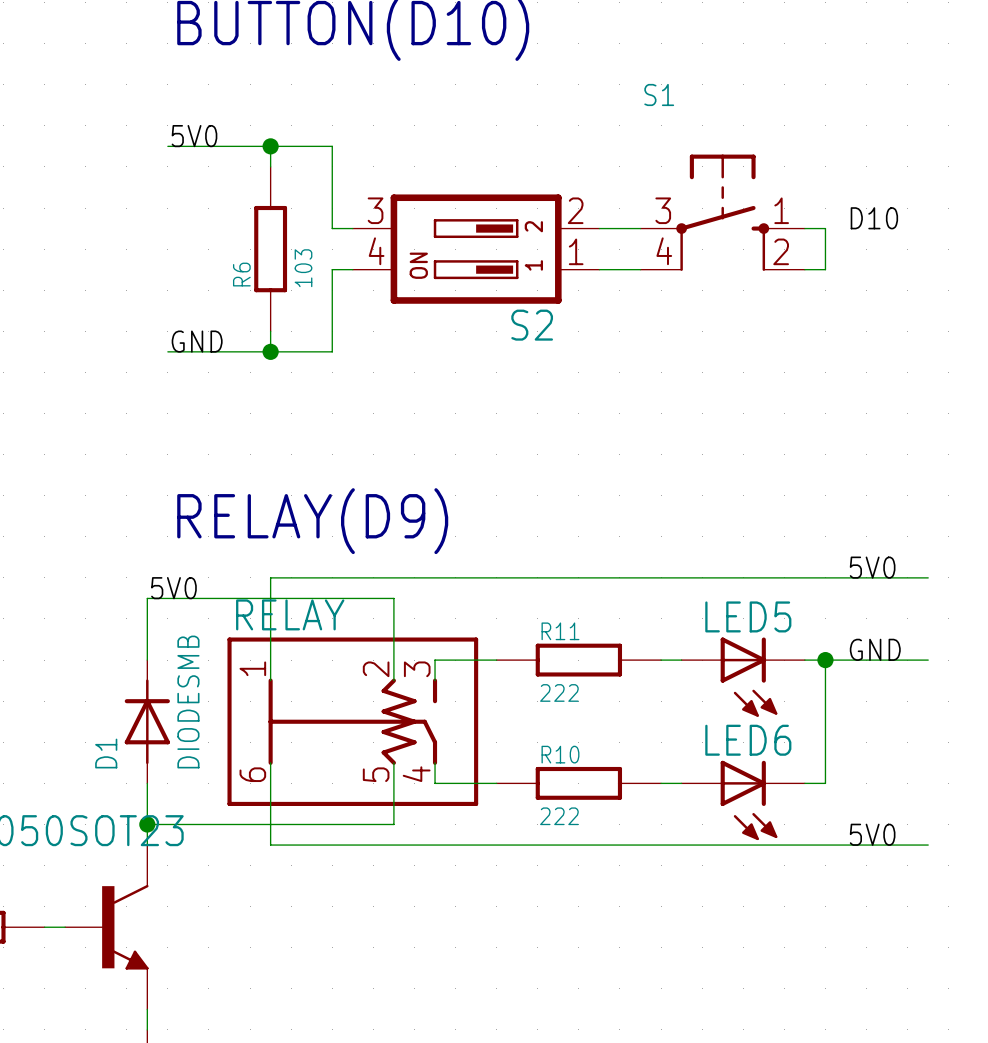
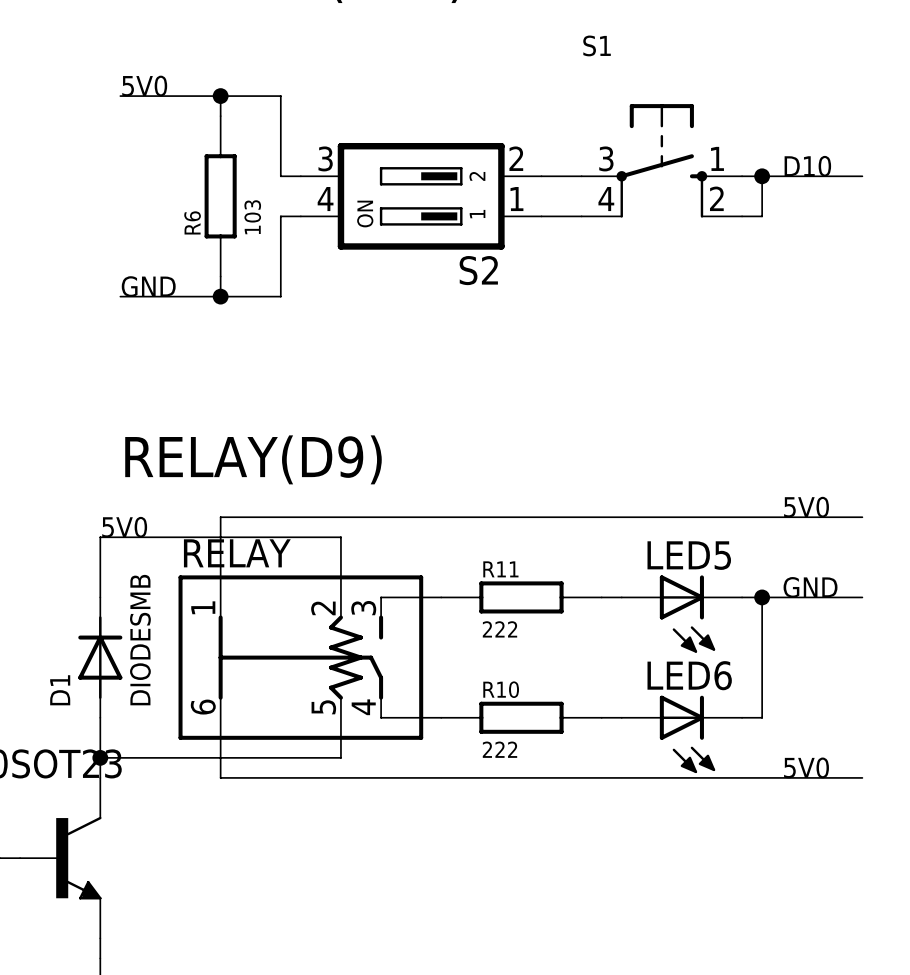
wire: none -> (762, 176) (862, 176)
junction: none -> (762, 176)

